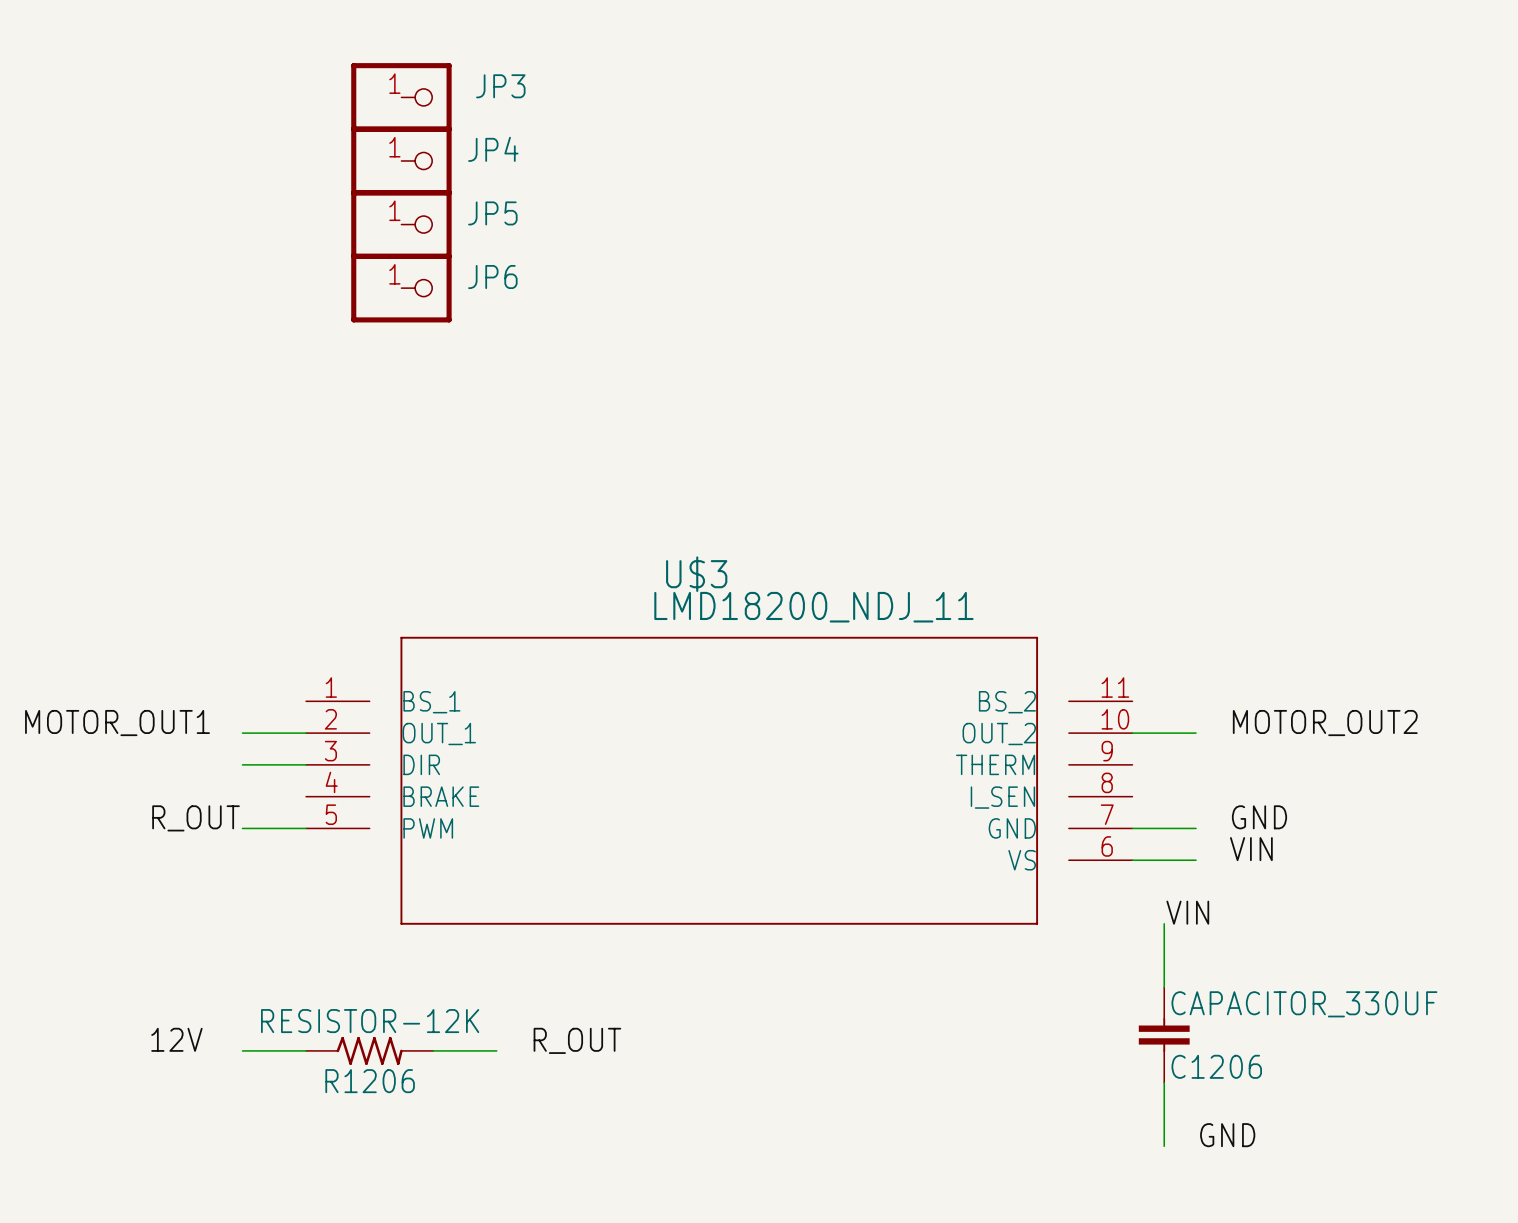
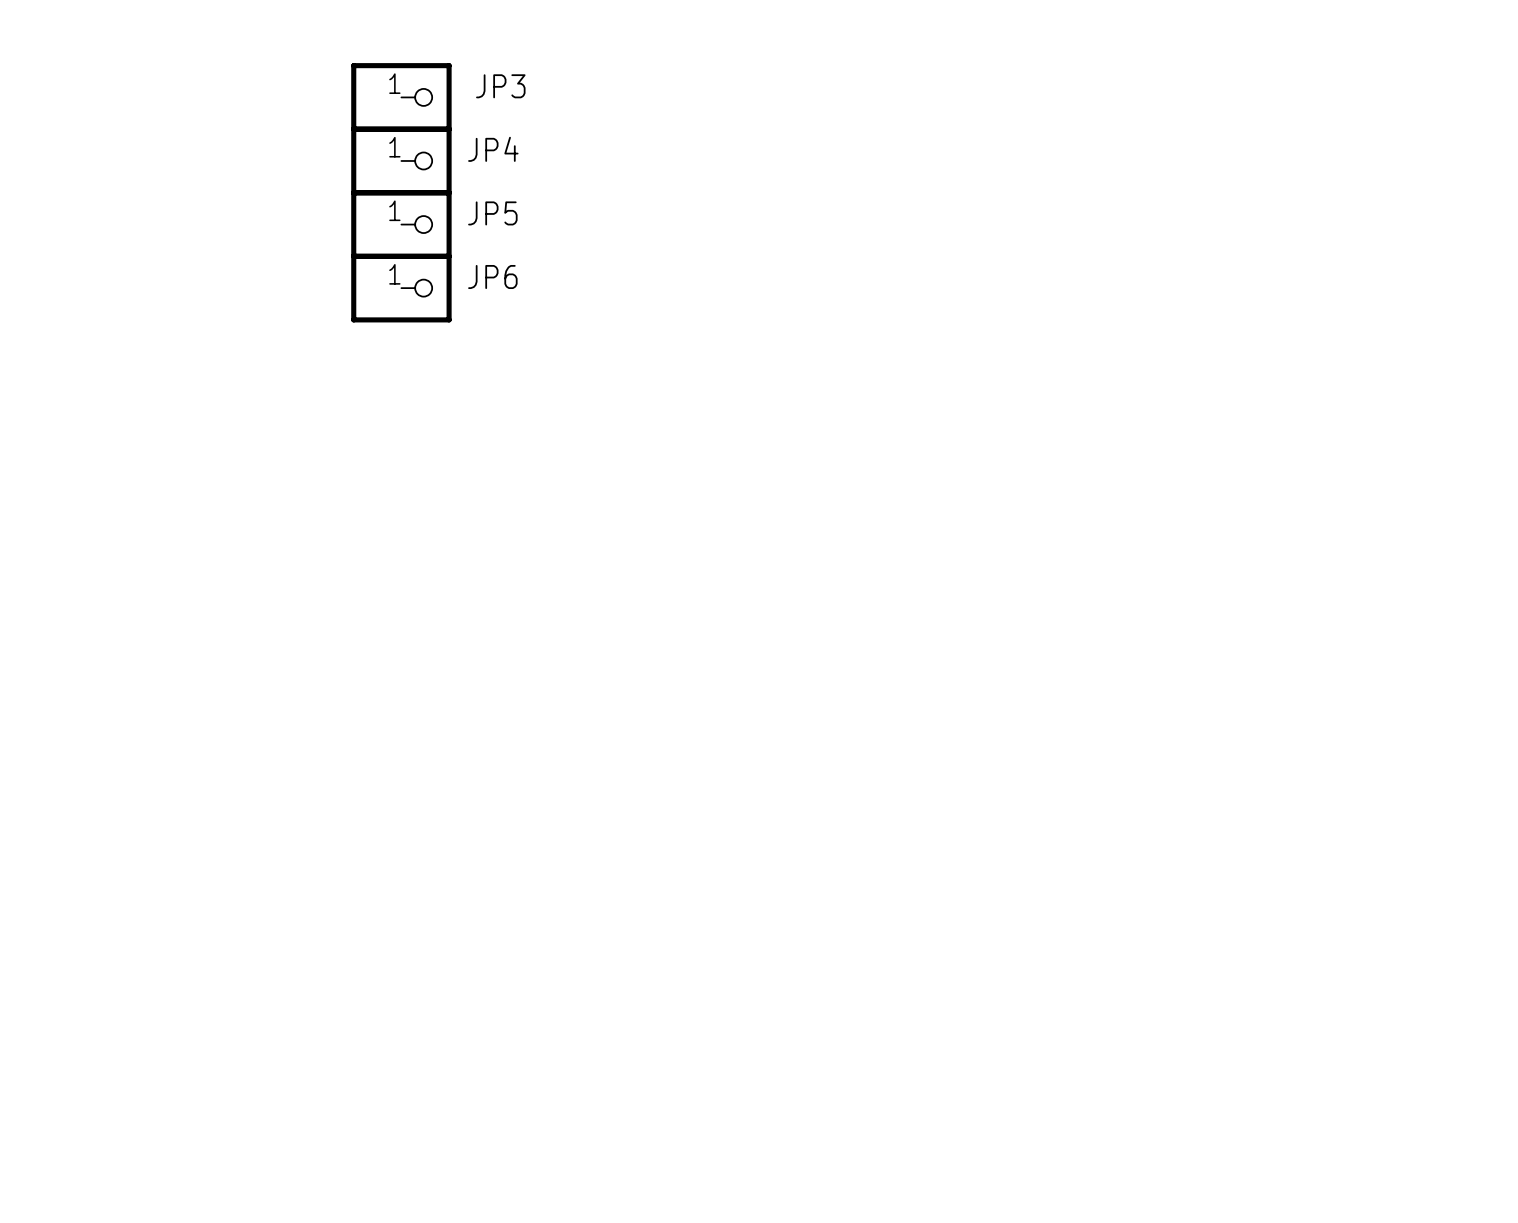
label: MOTOR_OUT1 (117, 723) -> none
label: MOTOR_OUT2 (1325, 723) -> none
wire: (242, 733) (306, 733) -> none
wire: (1132, 733) (1196, 733) -> none
wire: (242, 764) (306, 764) -> none
U$3: LMD18200_NDJ_11 (719, 780) -> none
label: GND (1259, 817) -> none
label: R_OUT (196, 818) -> none
wire: (242, 828) (306, 828) -> none
wire: (1132, 828) (1196, 828) -> none
label: VIN (1251, 849) -> none
wire: (1132, 860) (1196, 860) -> none
label: VIN (1187, 912) -> none
wire: (1164, 923) (1164, 987) -> none
CAPACITOR_330UF: C1206 (1164, 1035) -> none
label: 12V (176, 1039) -> none
label: R_OUT (577, 1040) -> none
wire: (242, 1050) (306, 1050) -> none
RESISTOR-12K: R1206 (369, 1050) -> none
wire: (433, 1050) (496, 1050) -> none
wire: (1164, 1082) (1164, 1146) -> none
label: GND (1227, 1135) -> none

